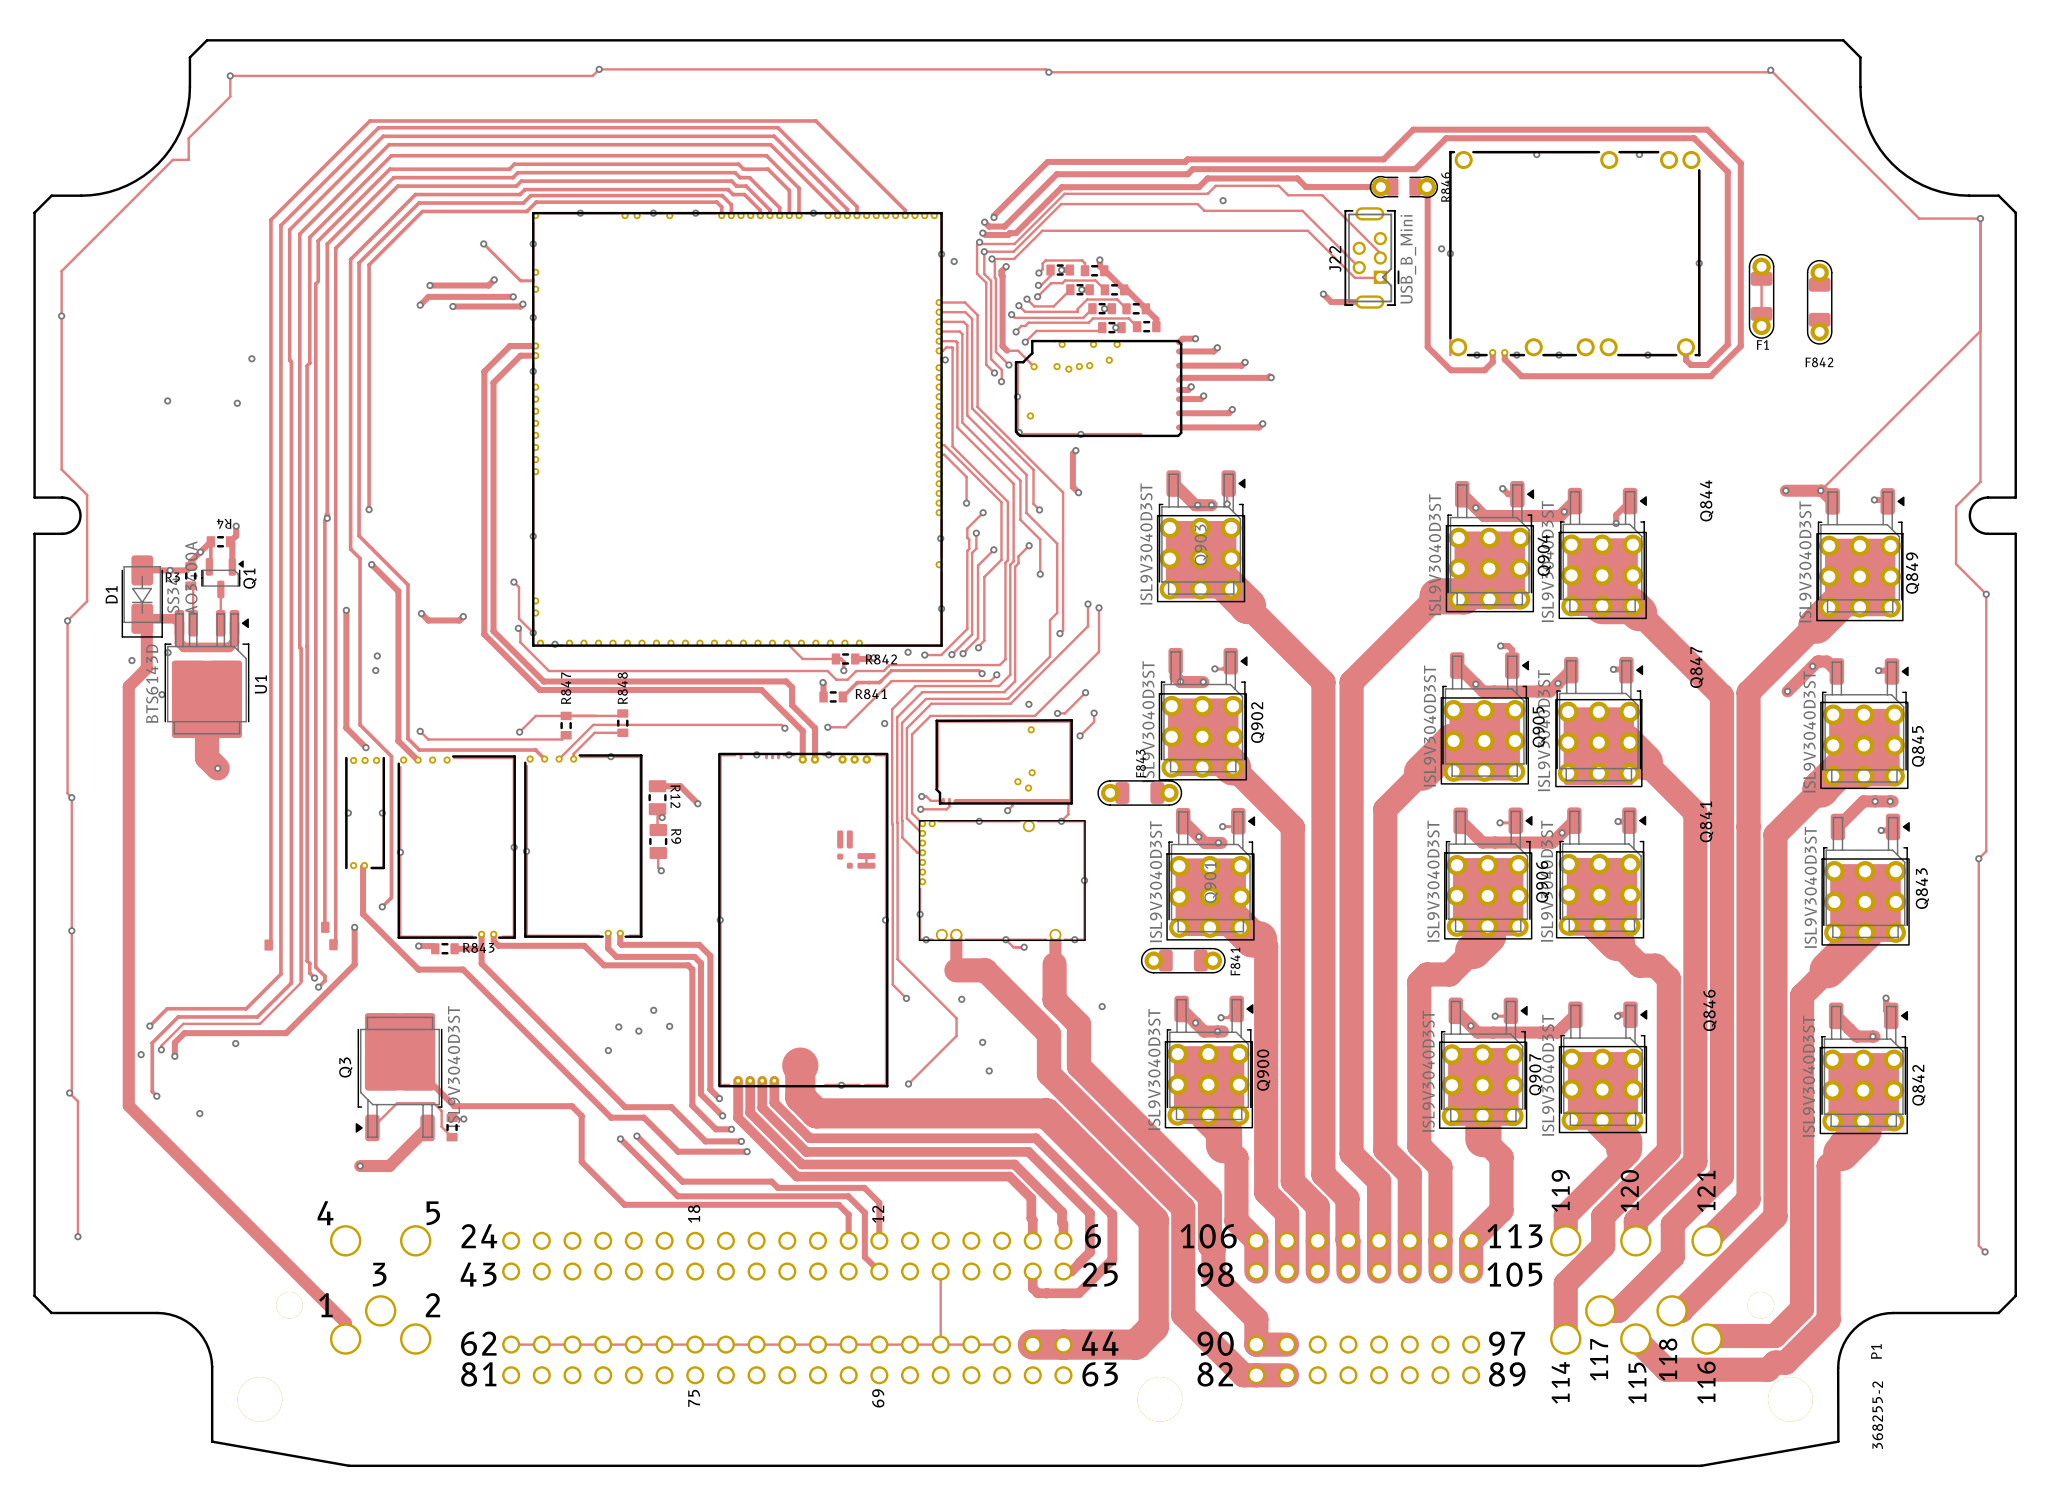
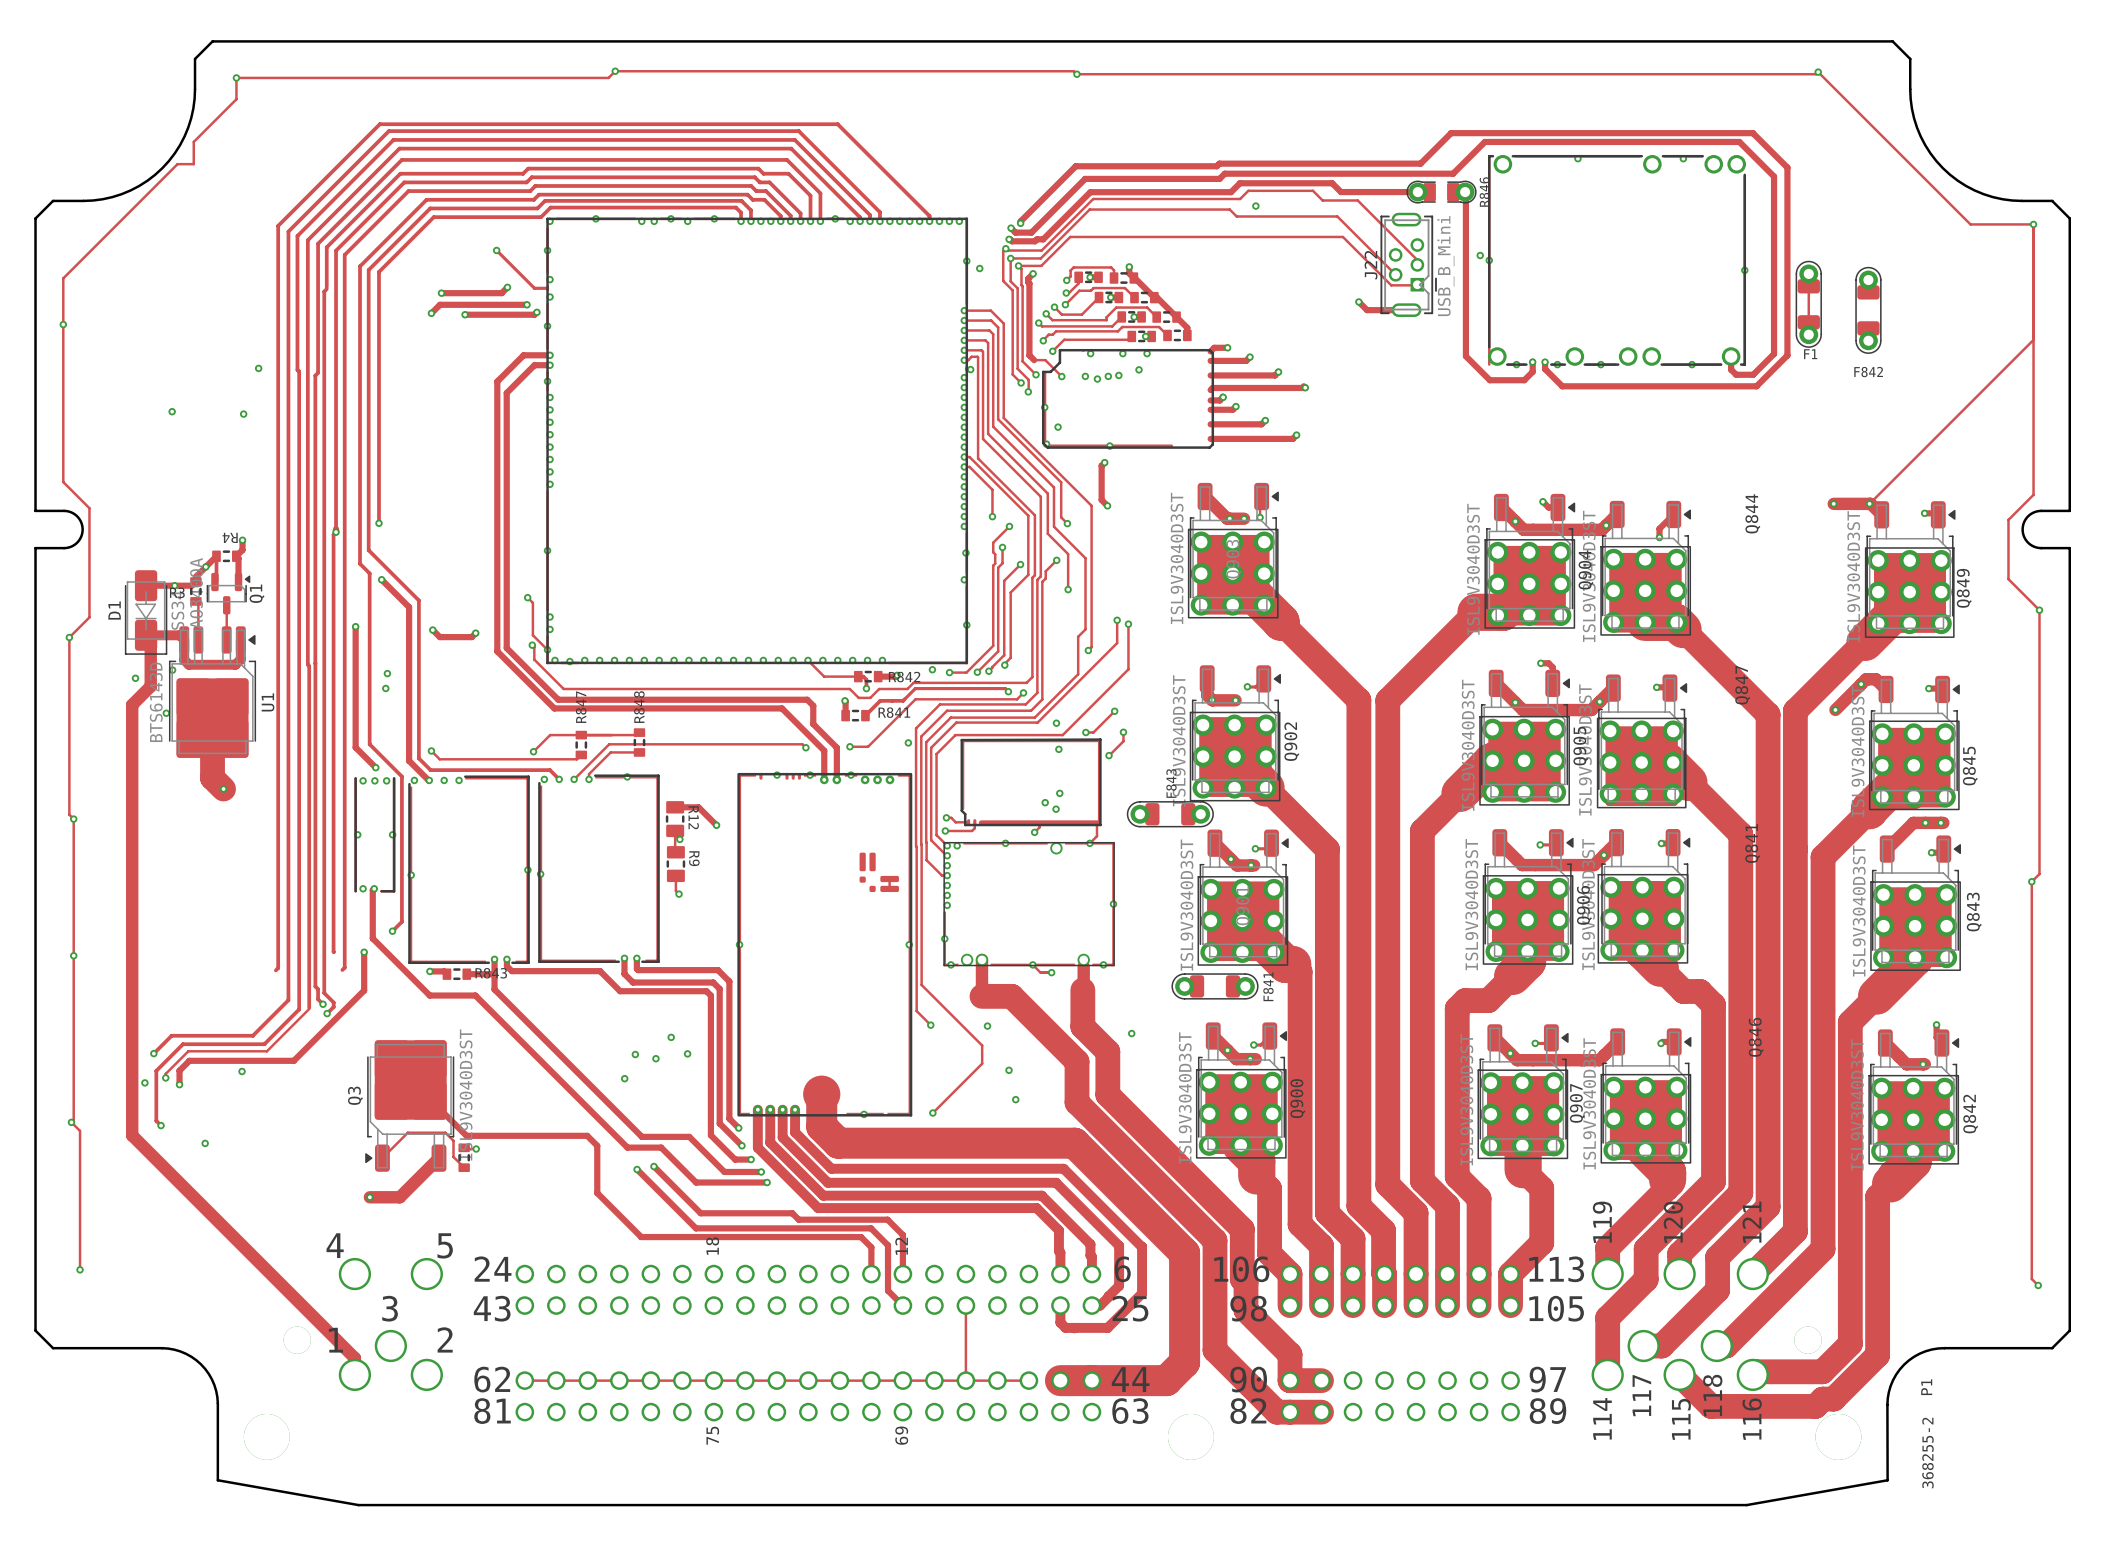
part: (325, 927) -> none
part: (333, 944) -> none
part: (268, 945) -> none

